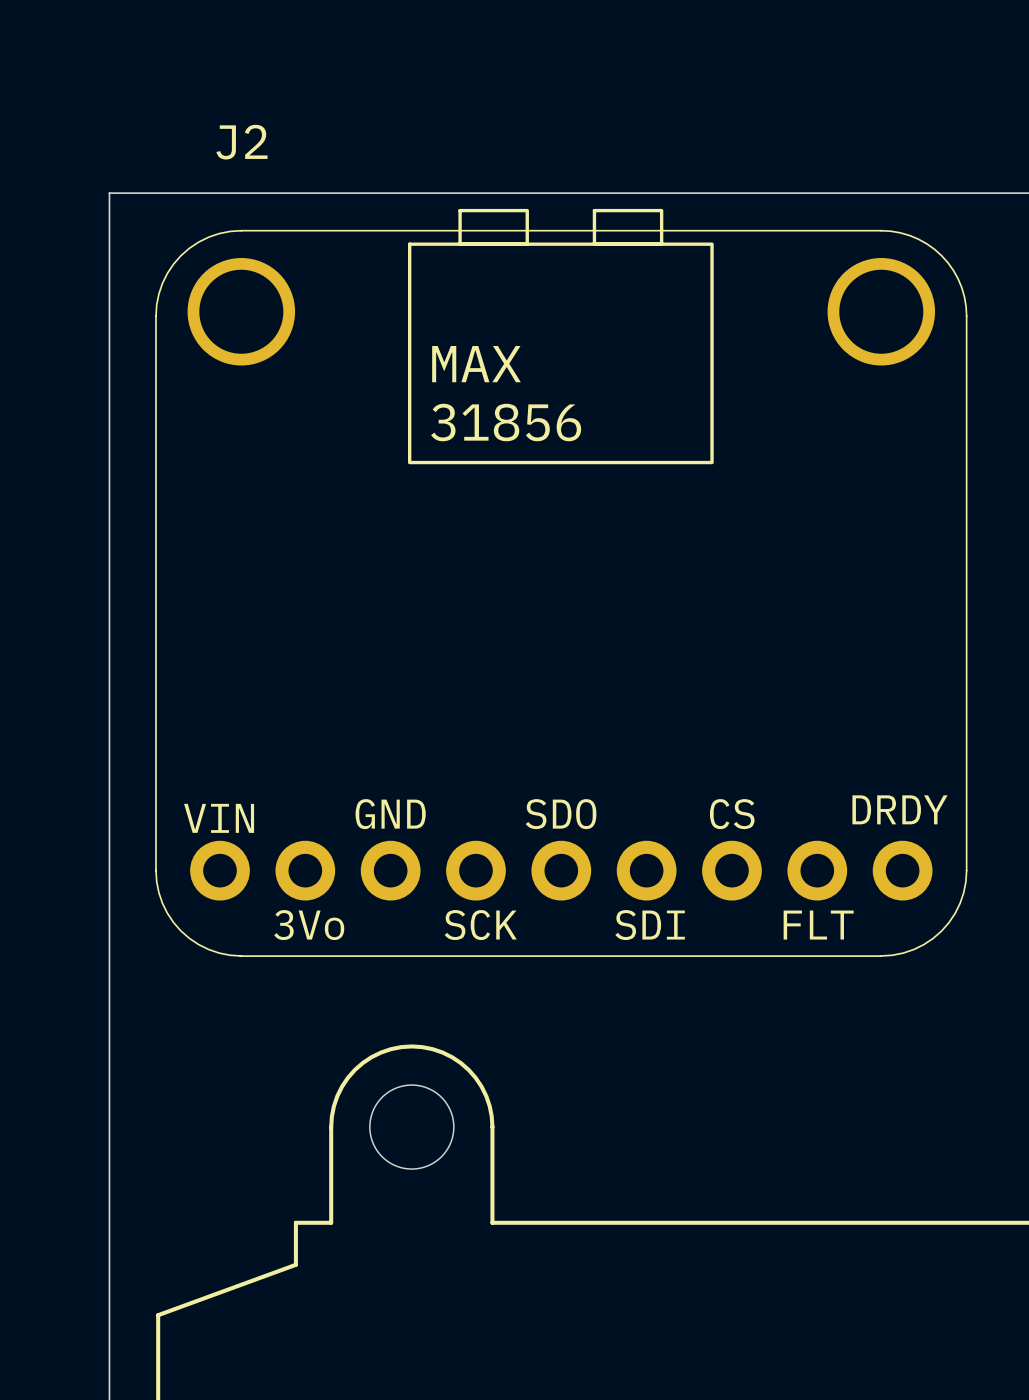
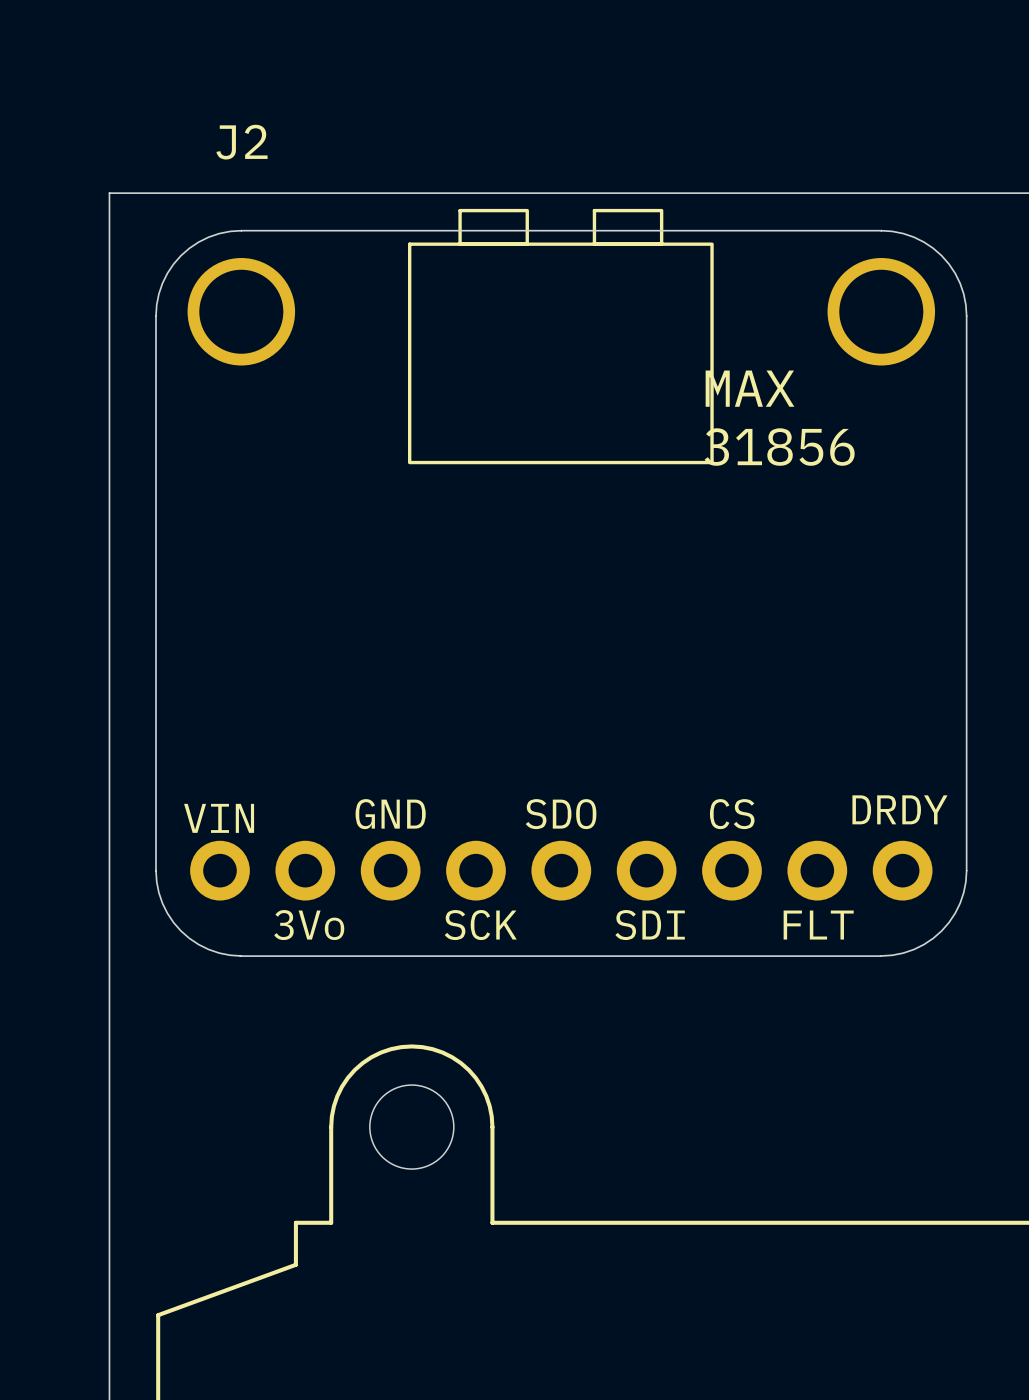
J2 footprint: [155, 208, 968, 957] -> [155, 208, 968, 957]

